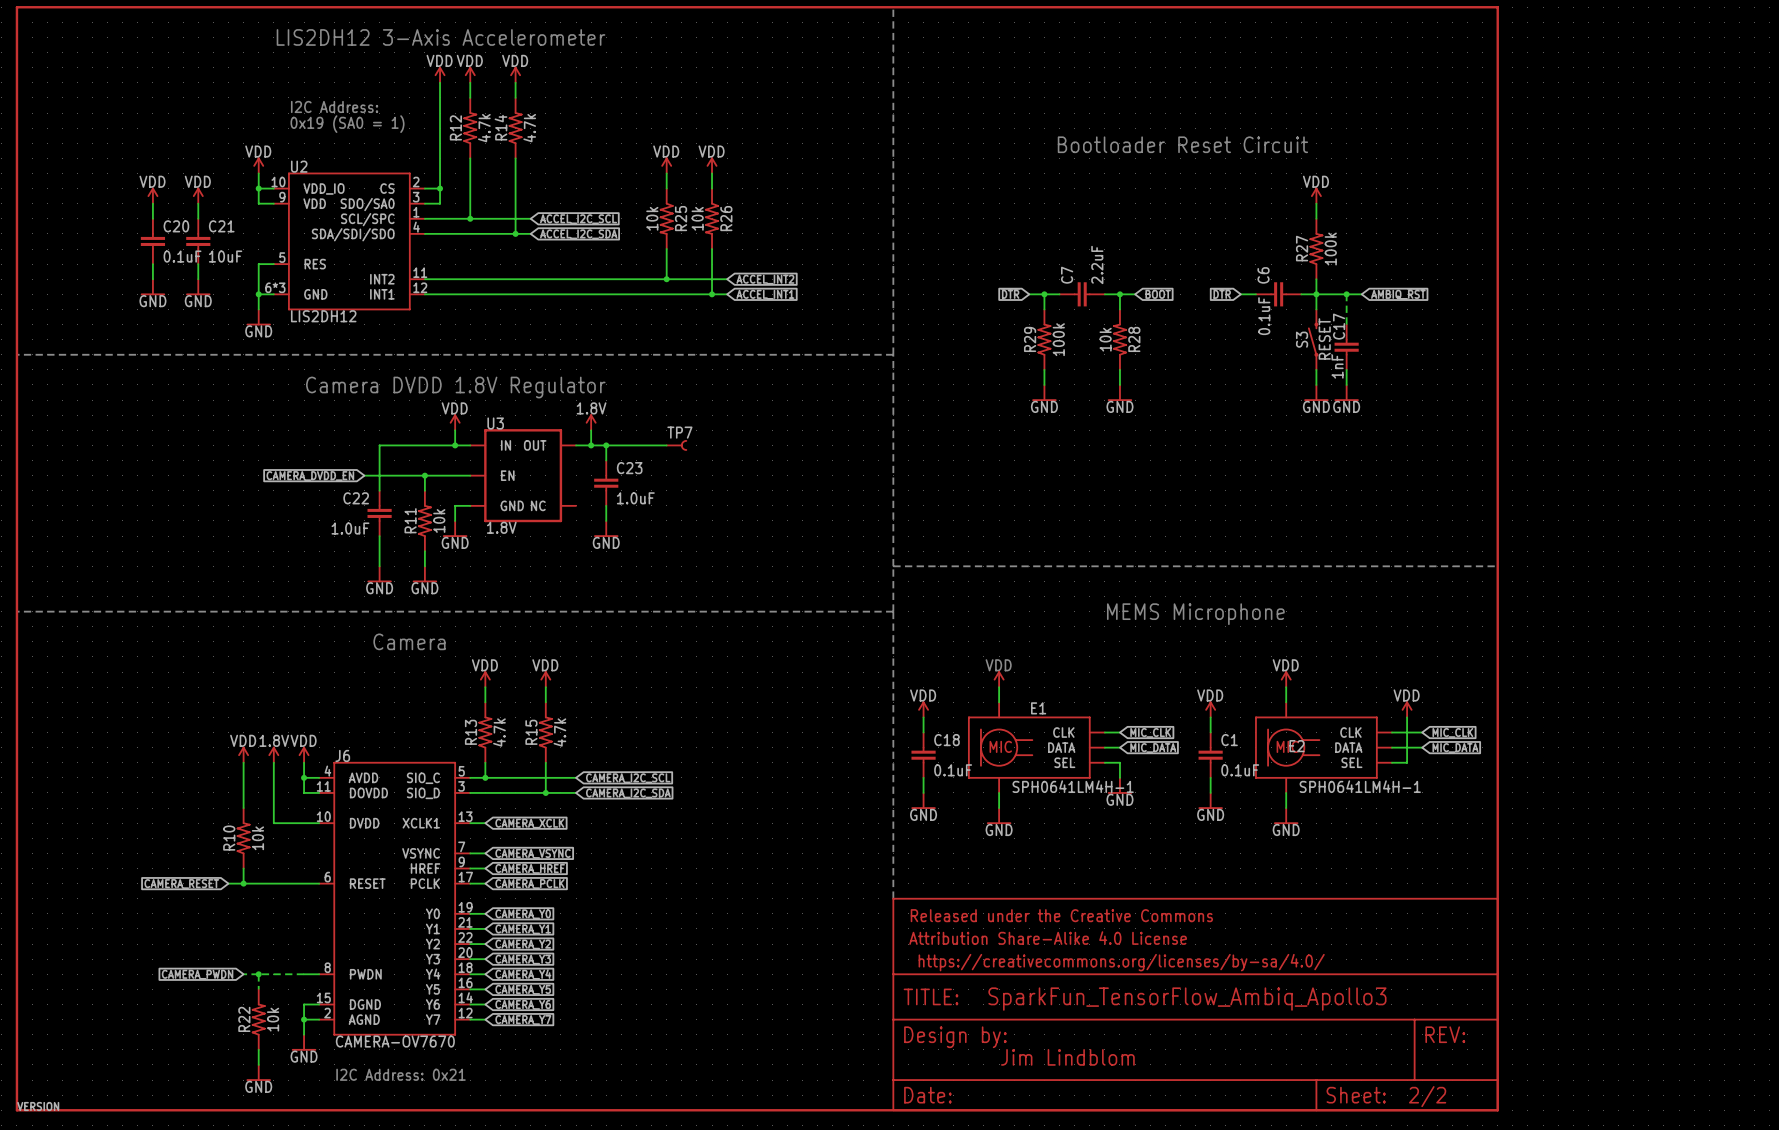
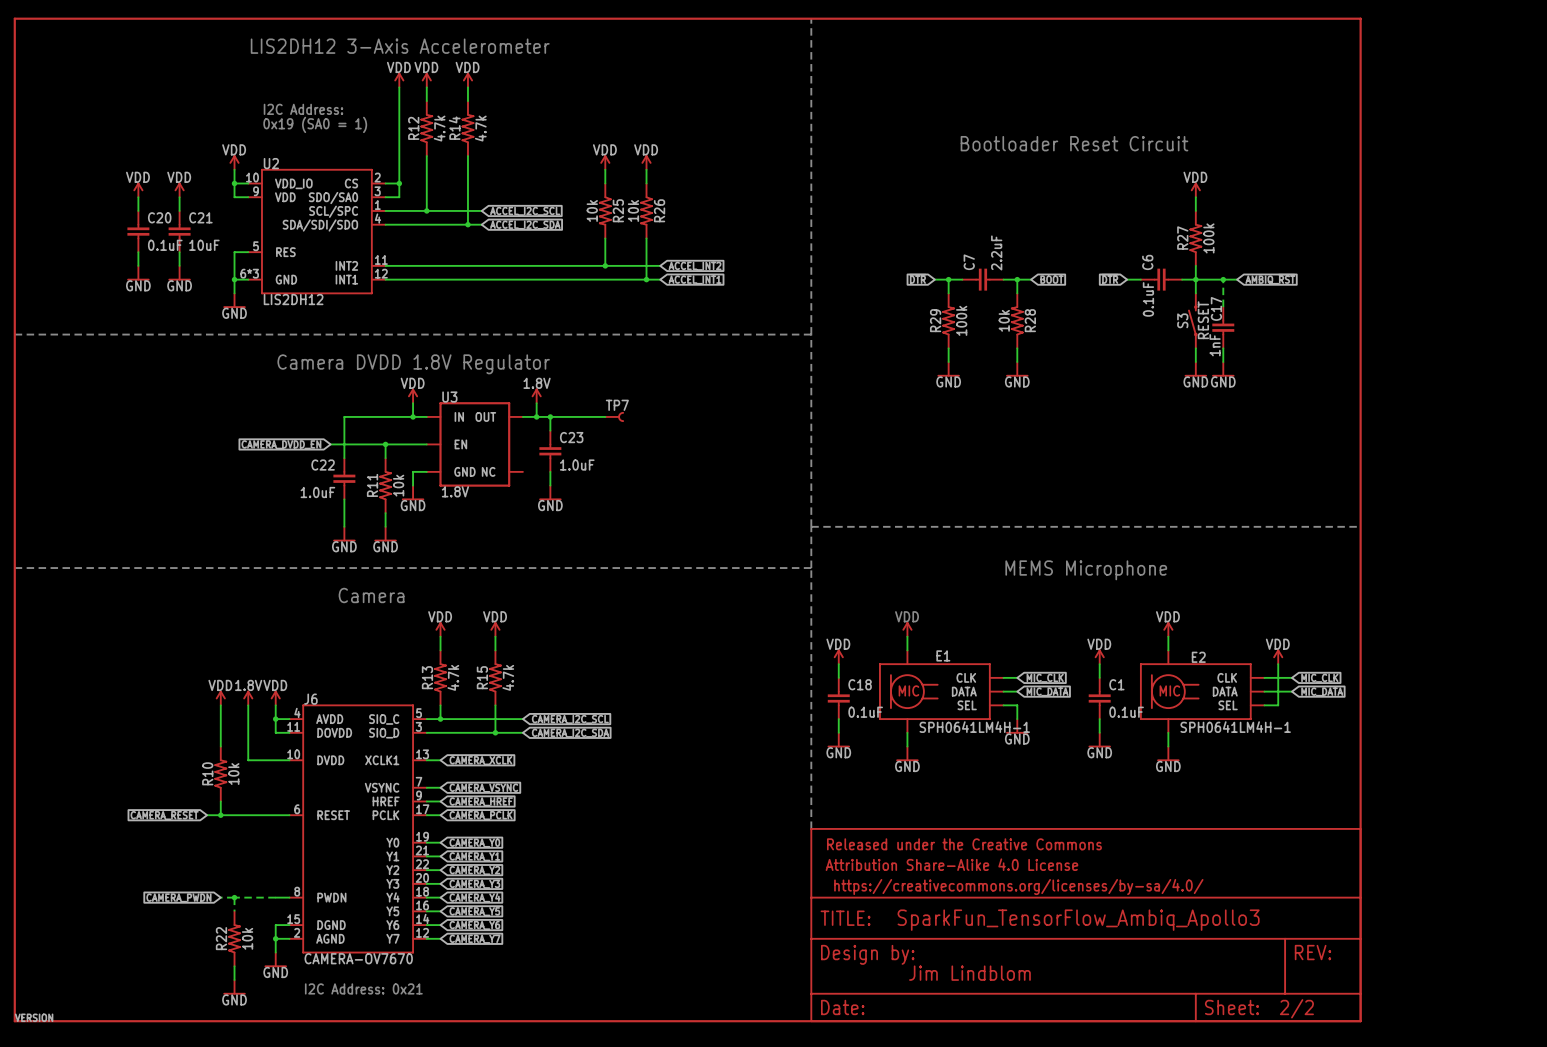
E2 name position: E2 (1296, 746) -> E2 (1198, 657)

